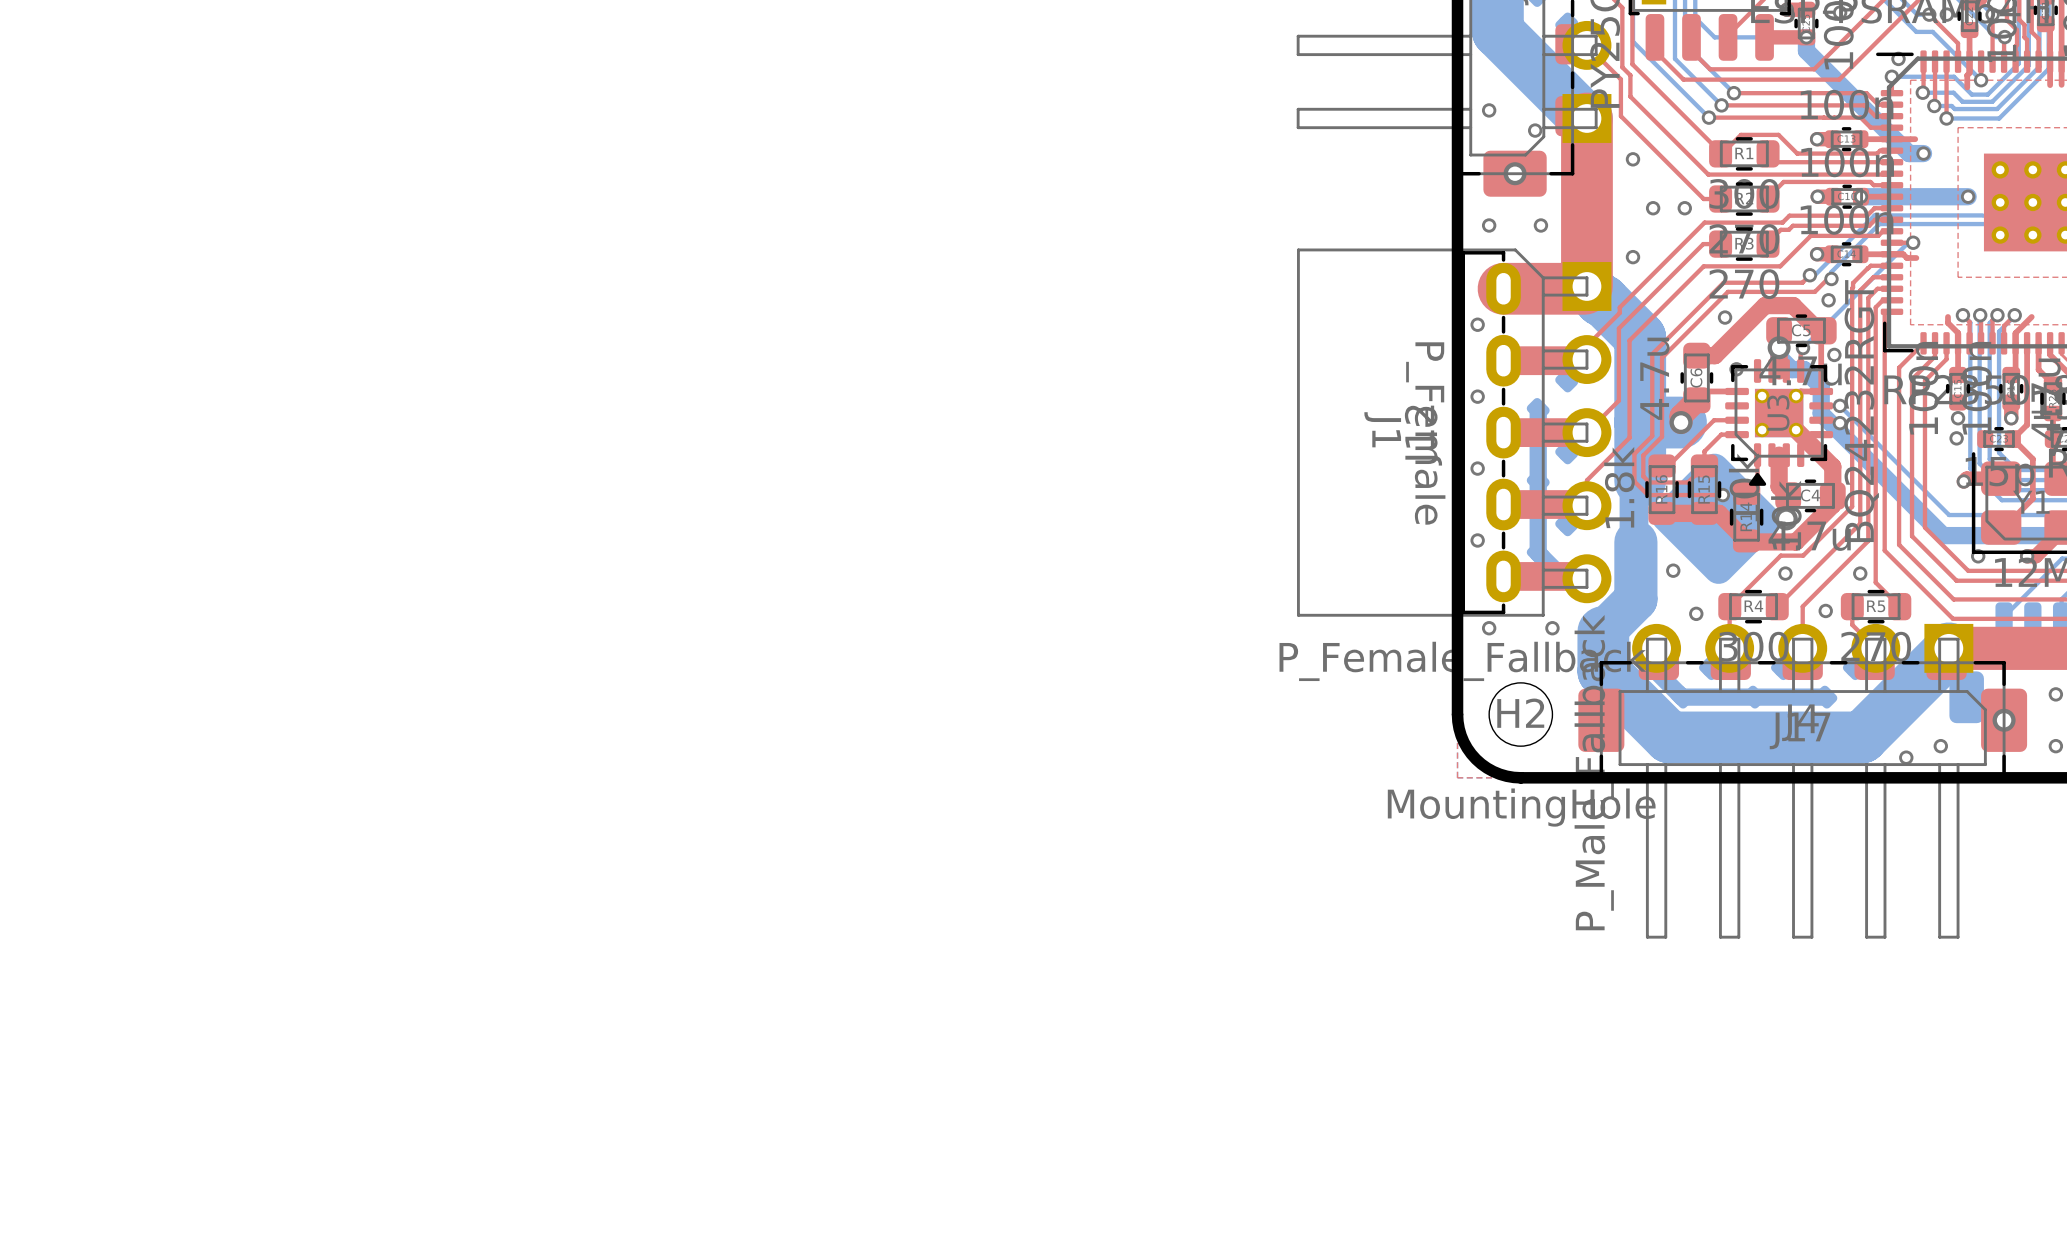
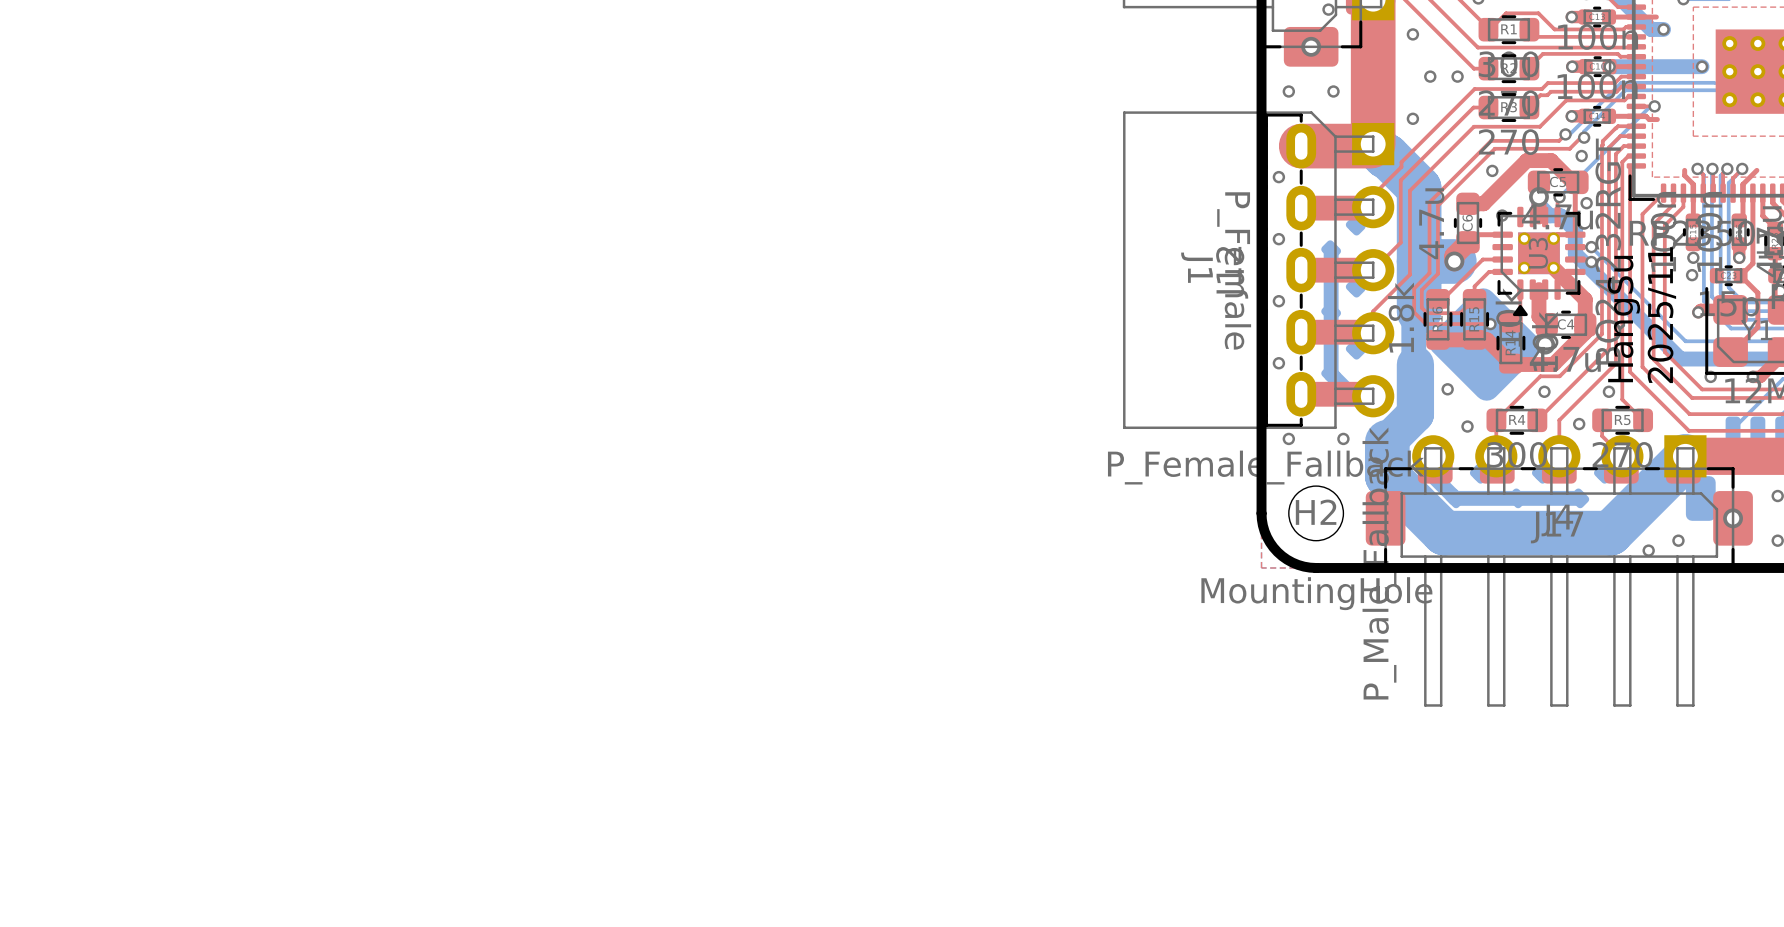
text: none -> 2025/11 (1661, 315)
text: none -> HangSu (1623, 319)

